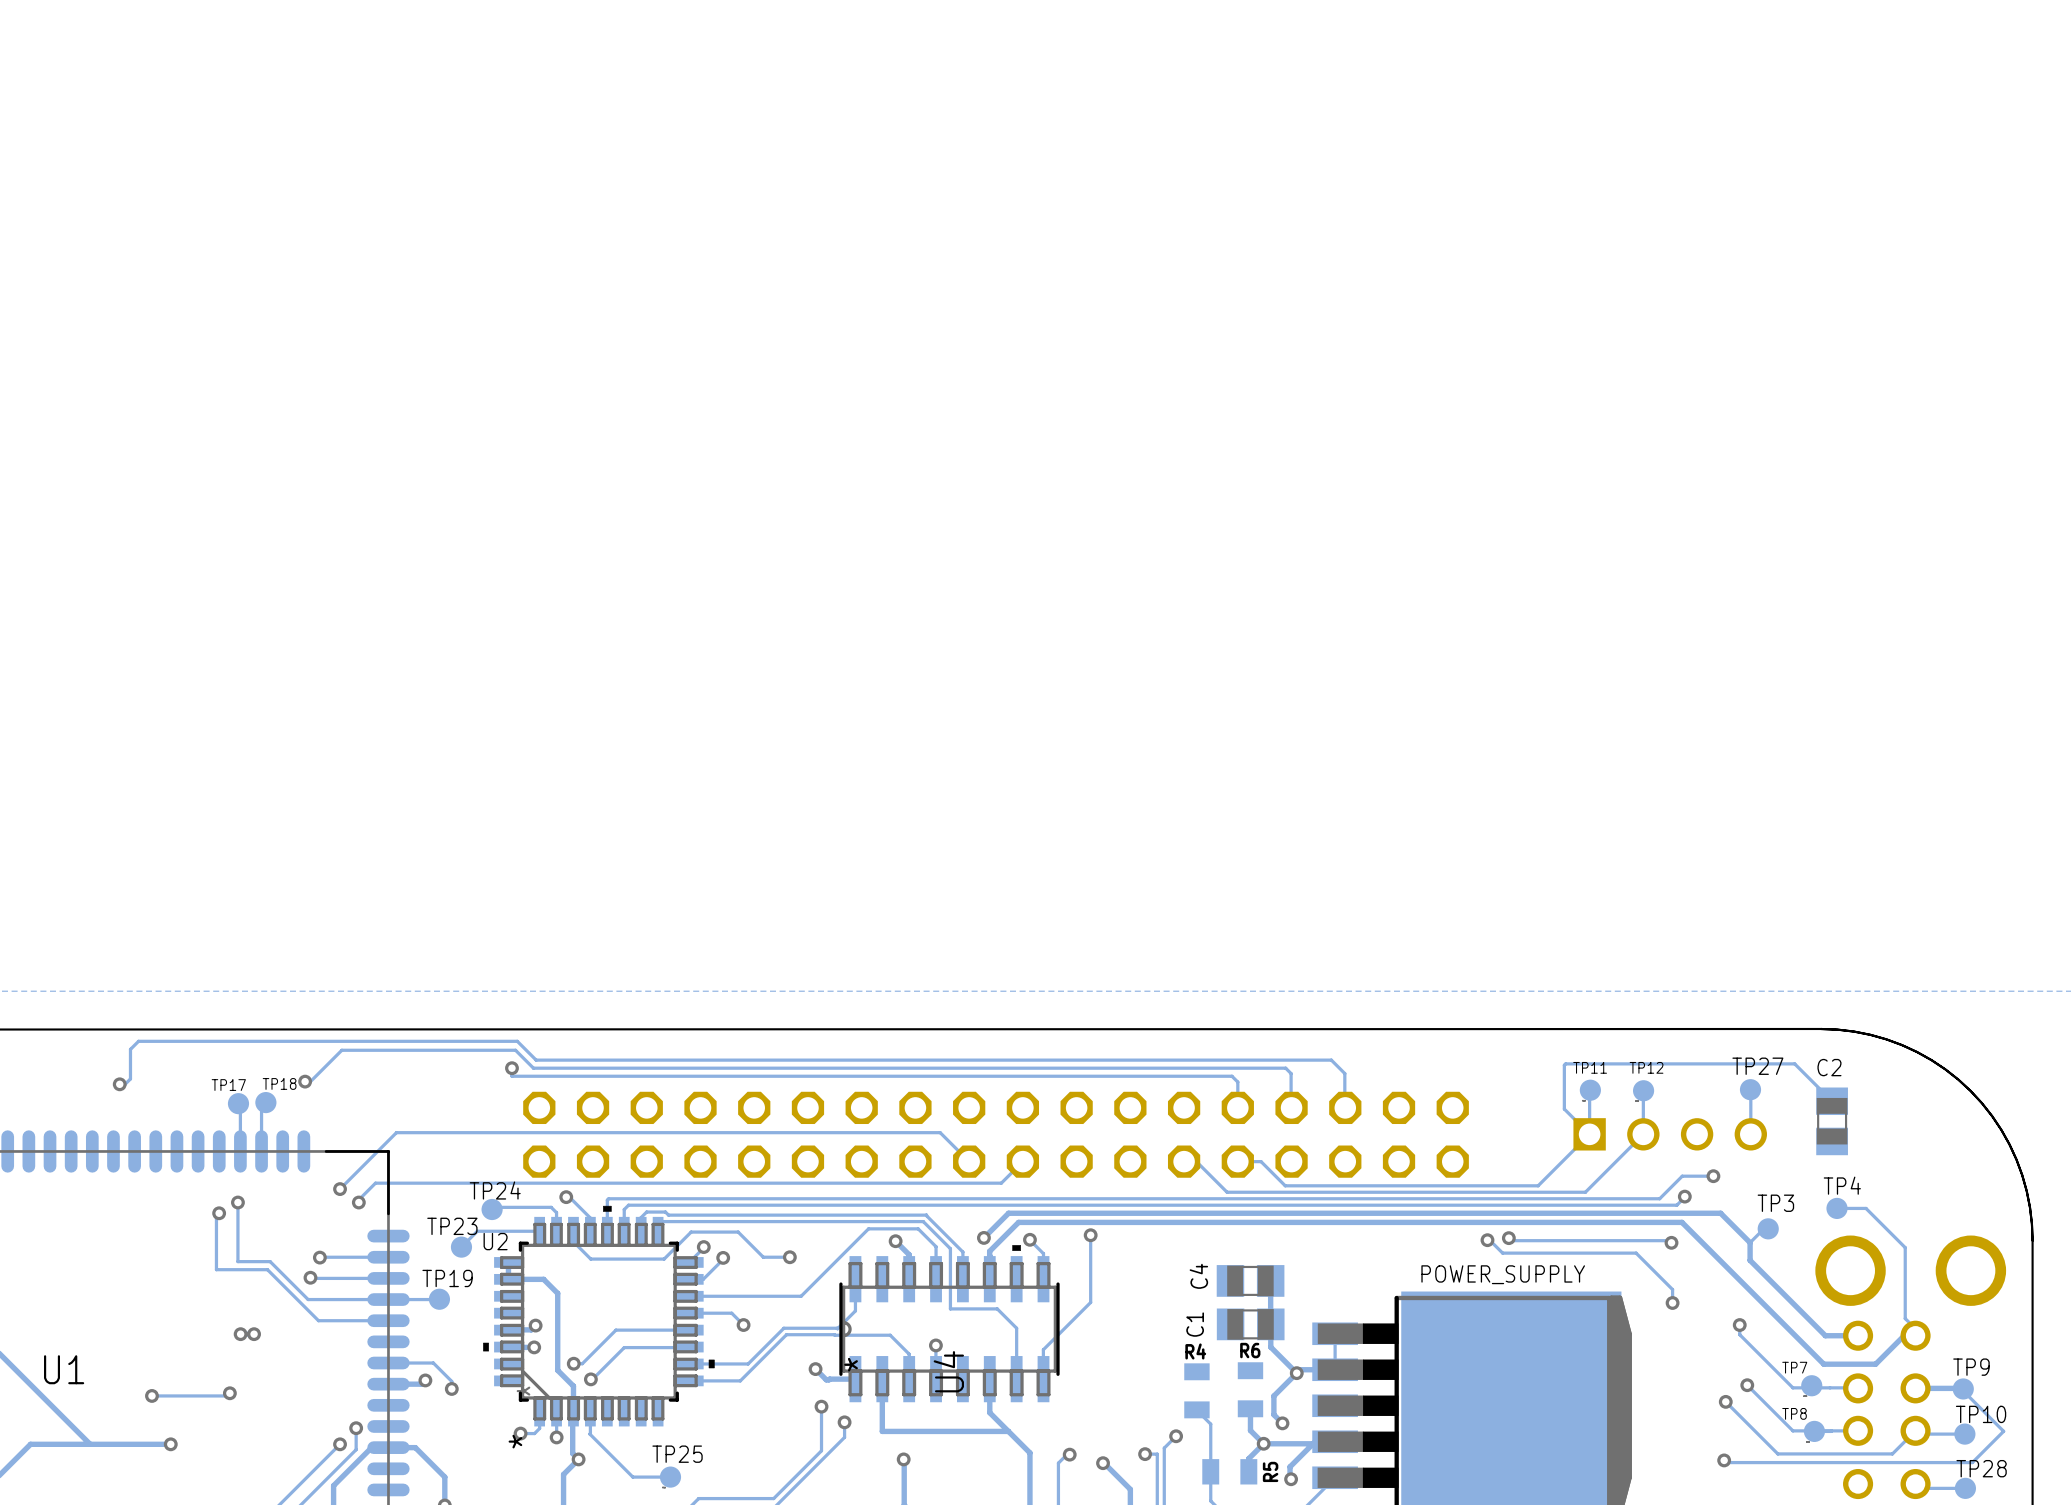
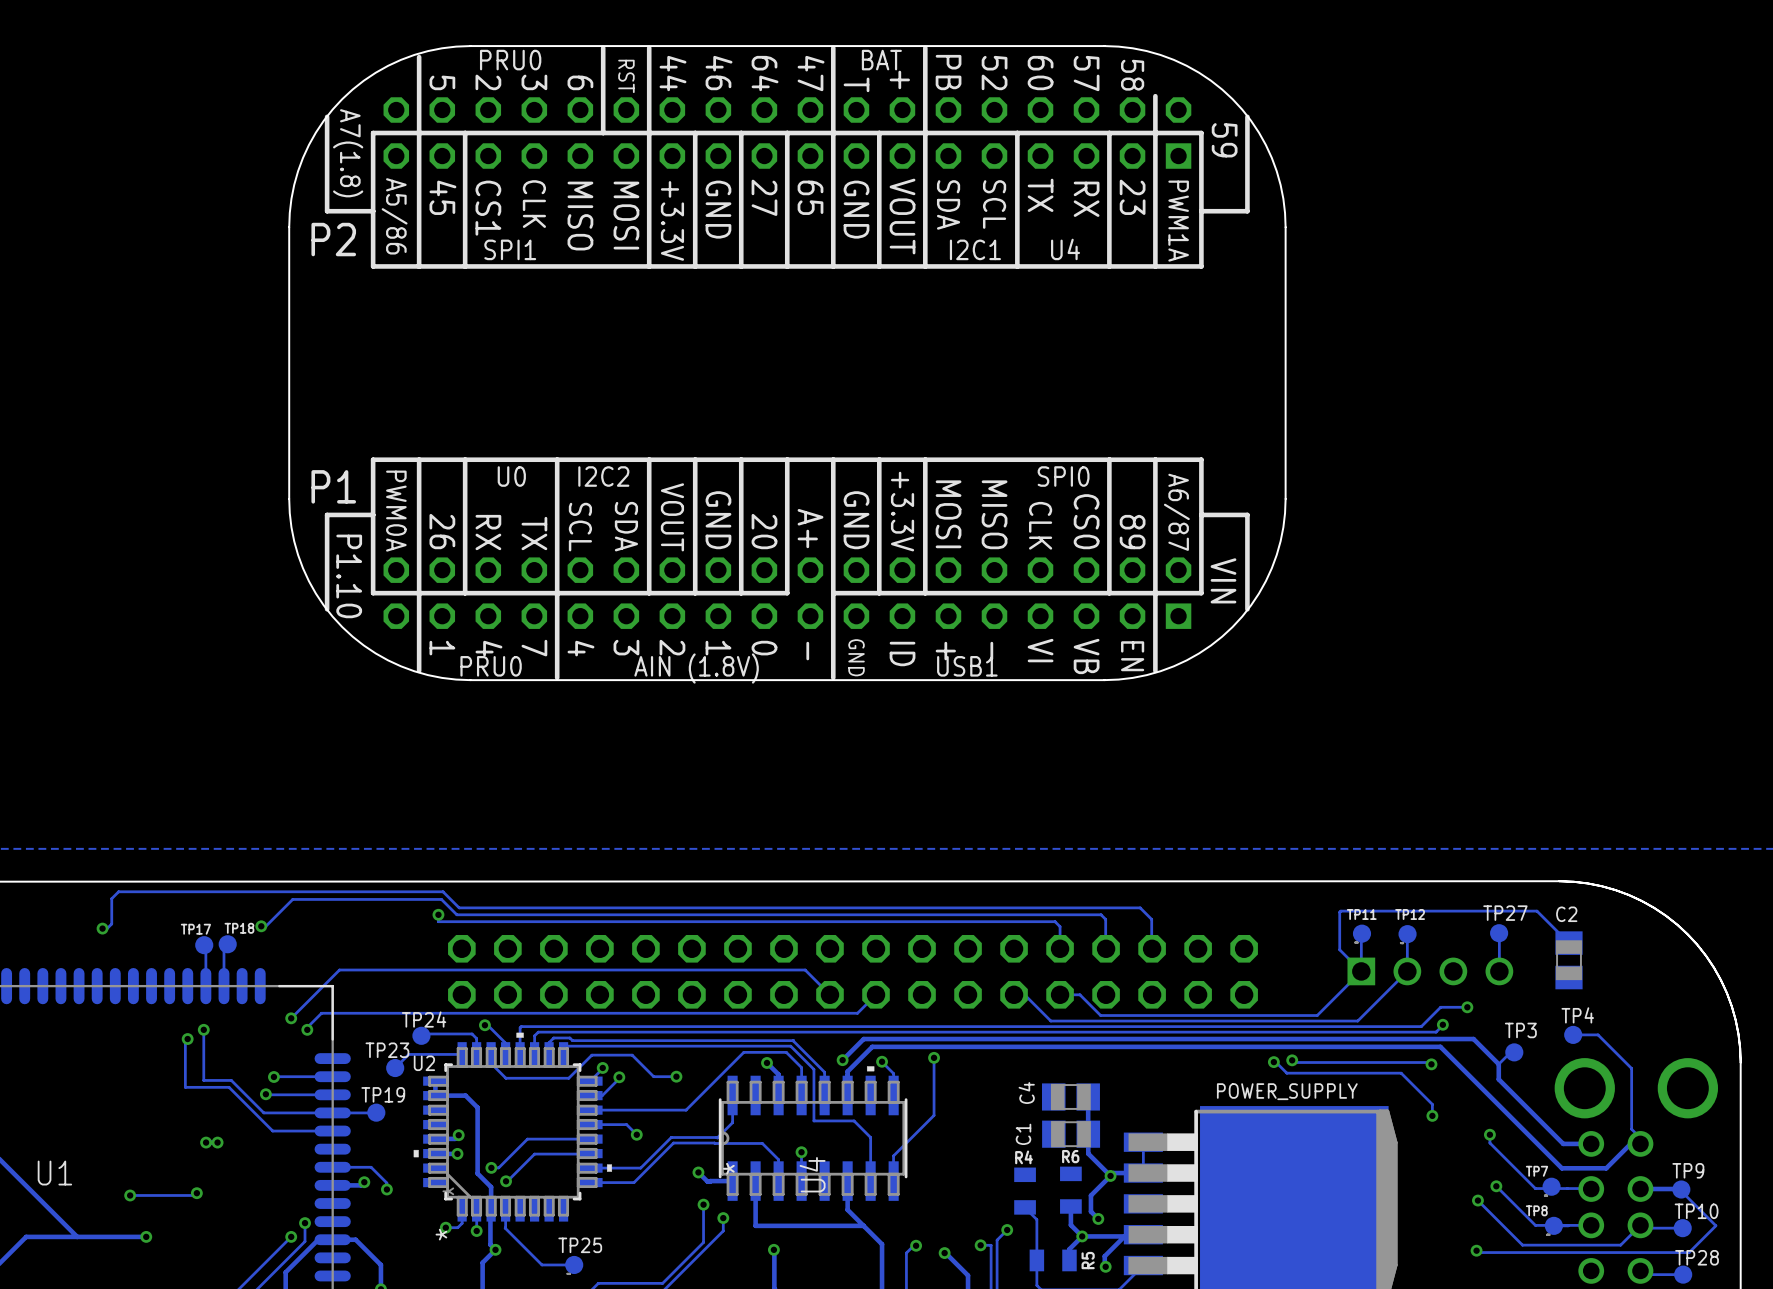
part: none -> (787, 362)

